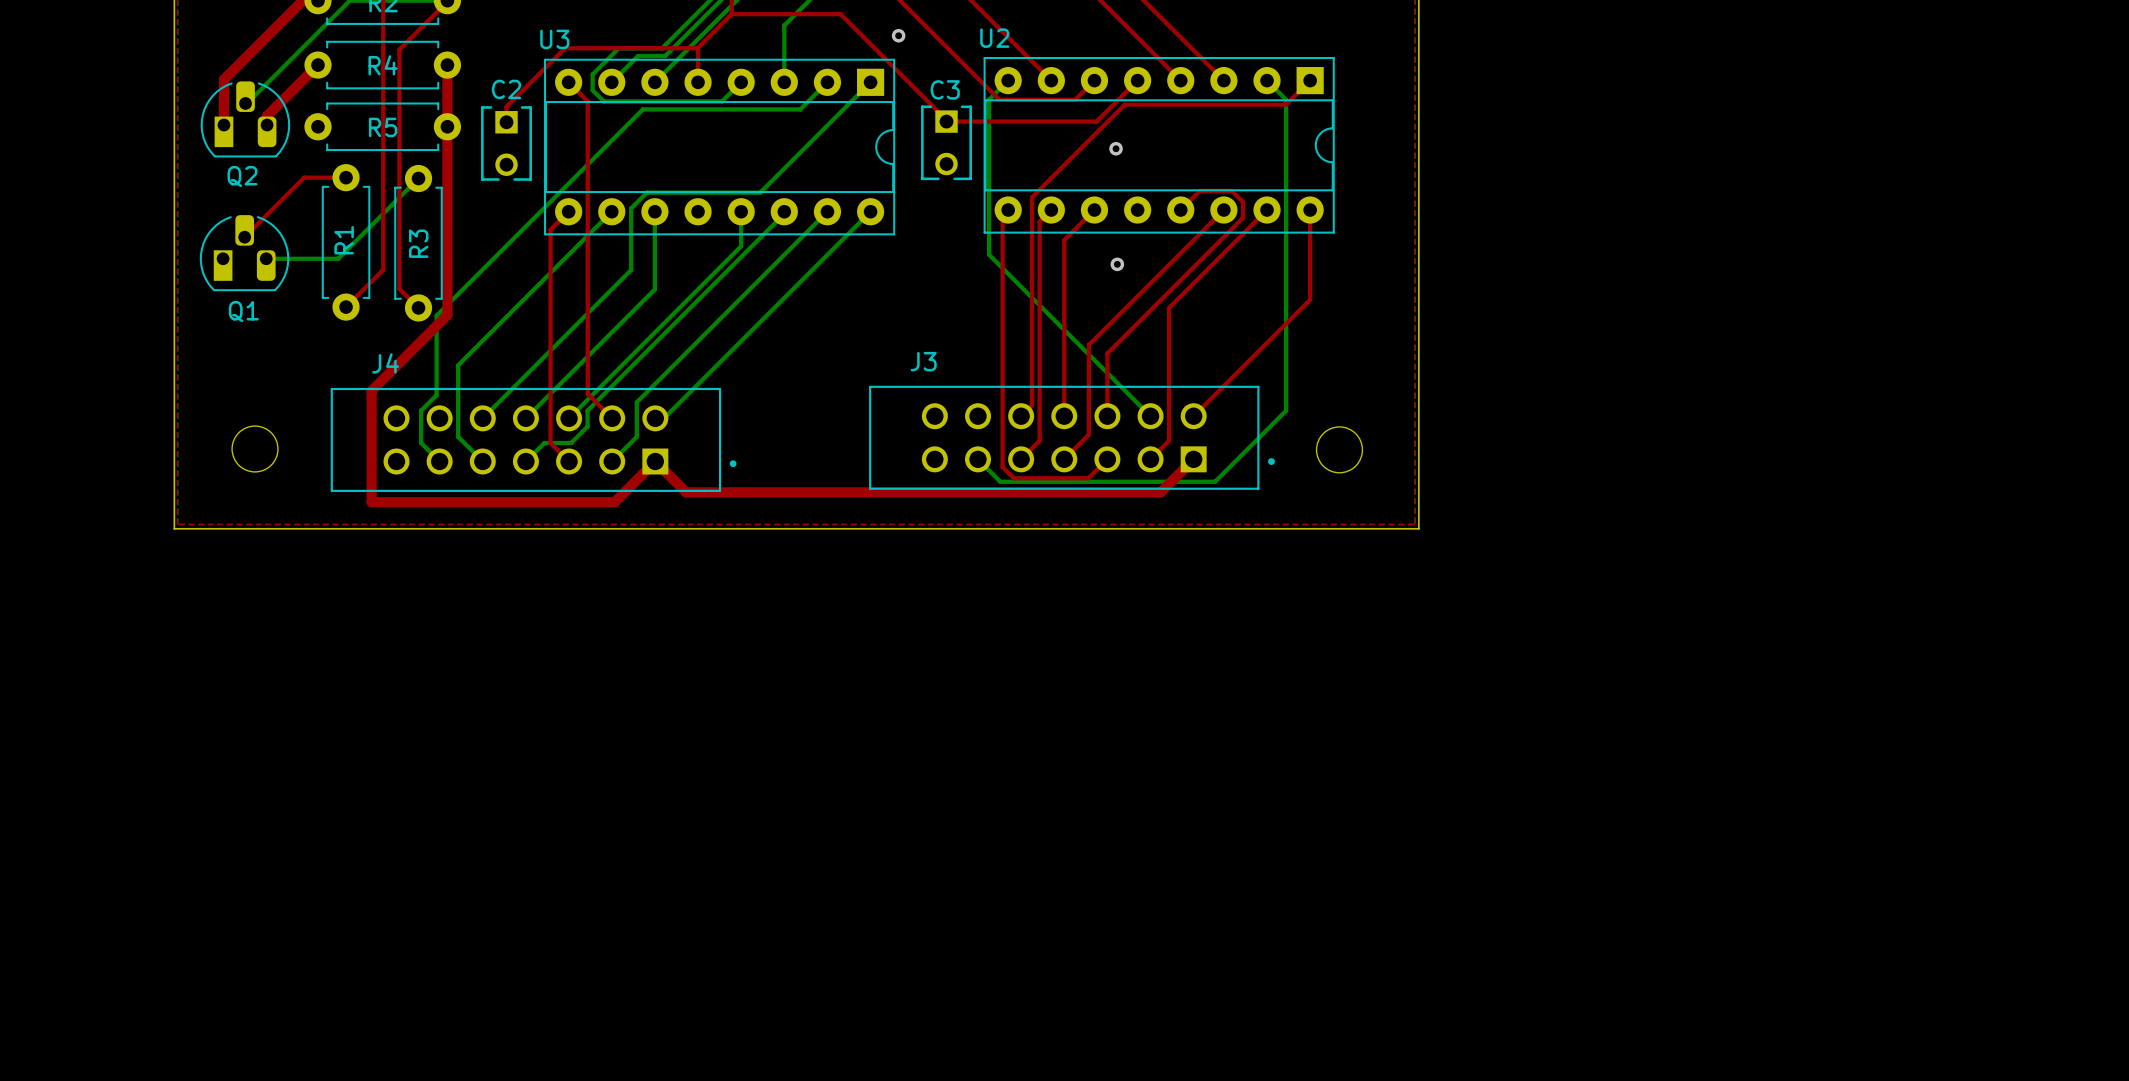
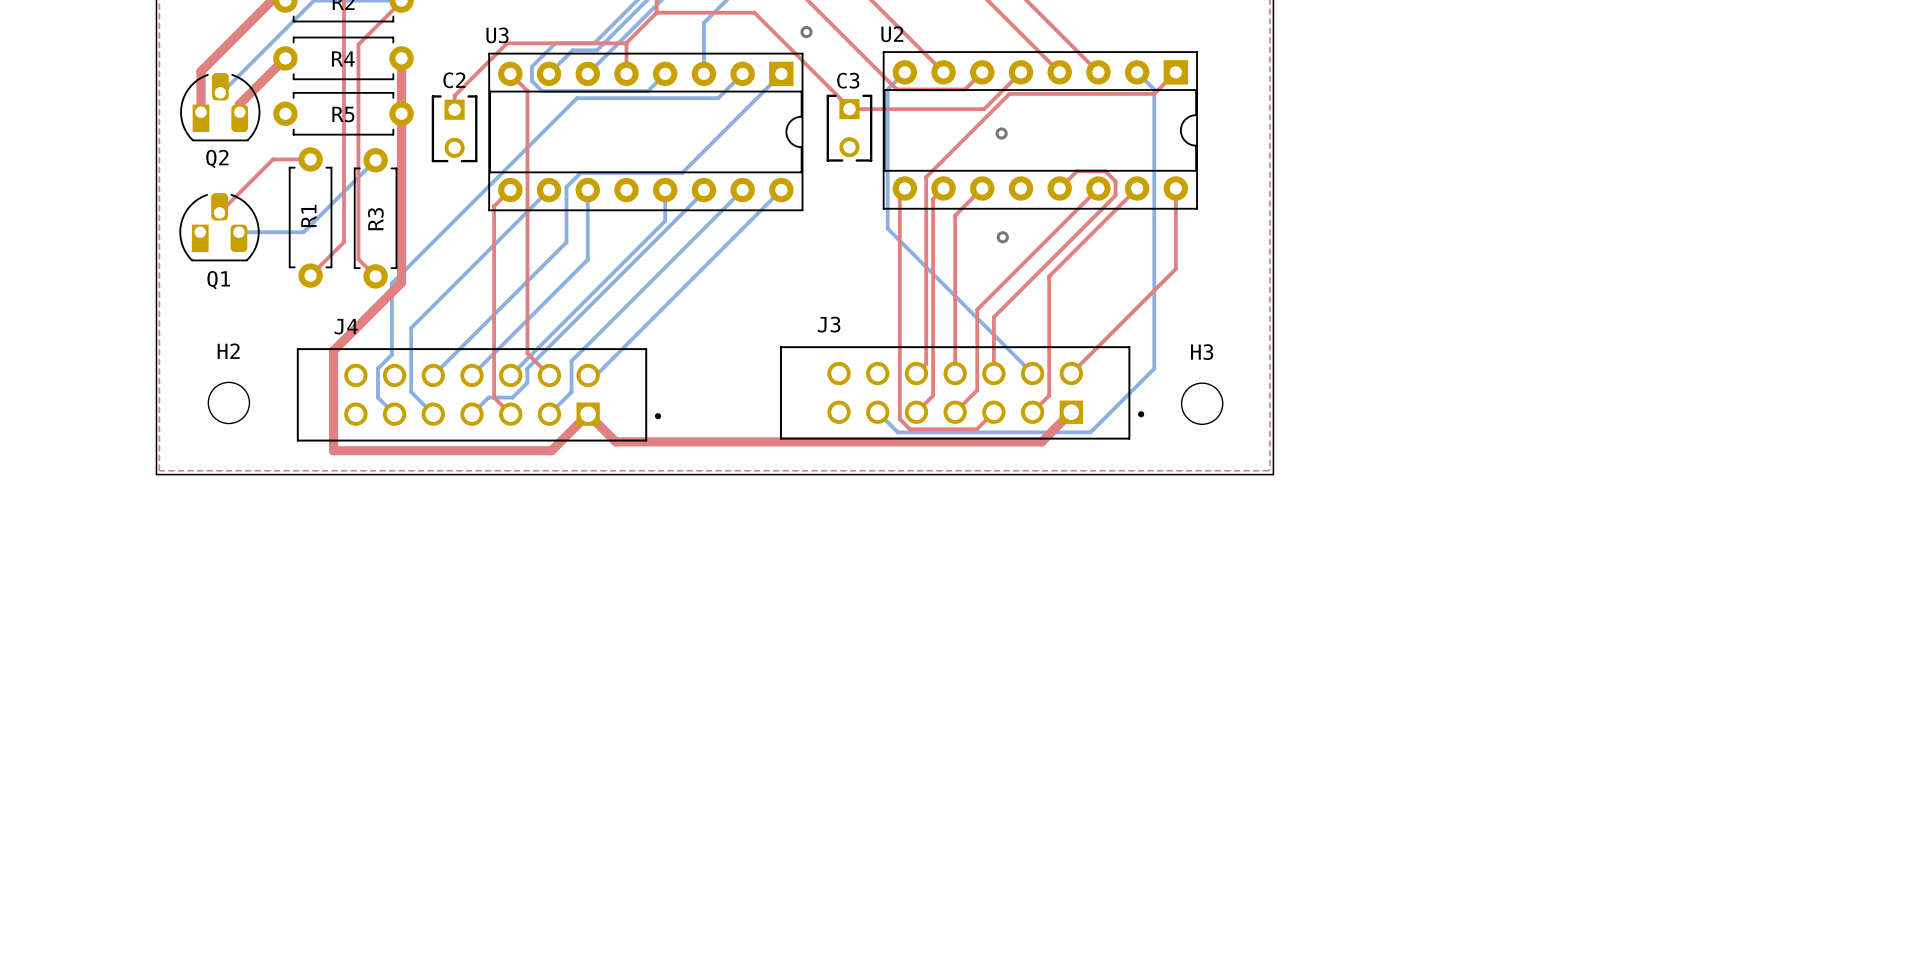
H2 name: none -> H2 (228, 351)
H3 name: none -> H3 (1202, 352)

